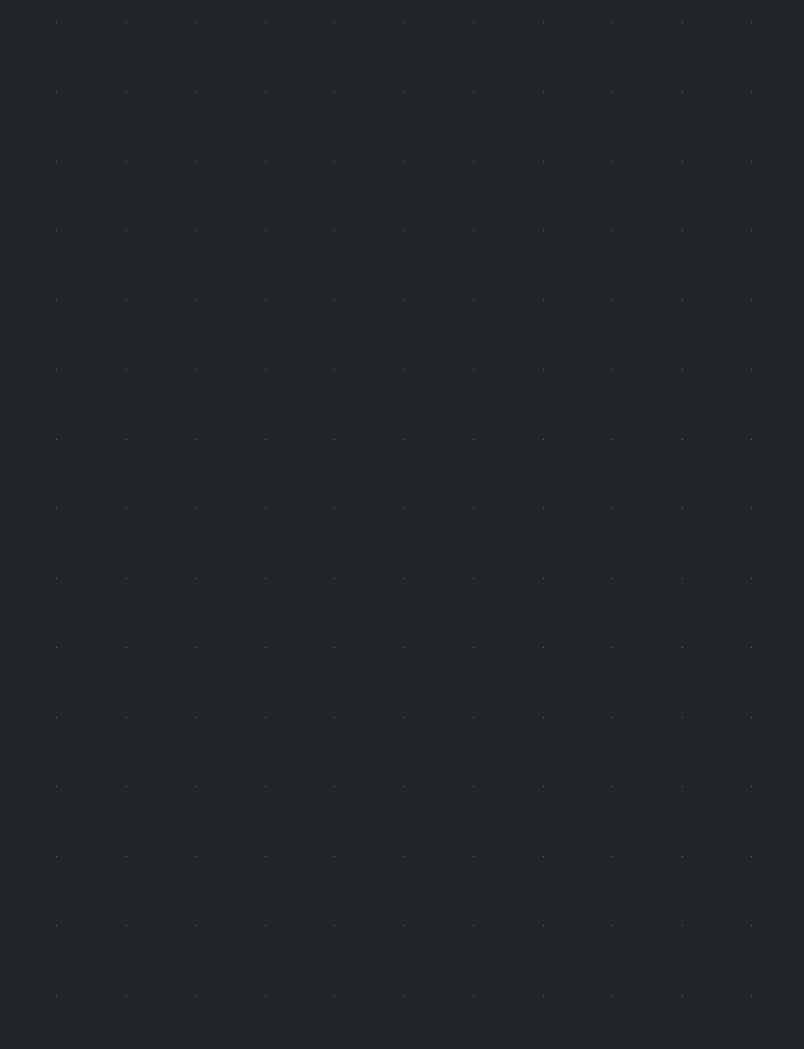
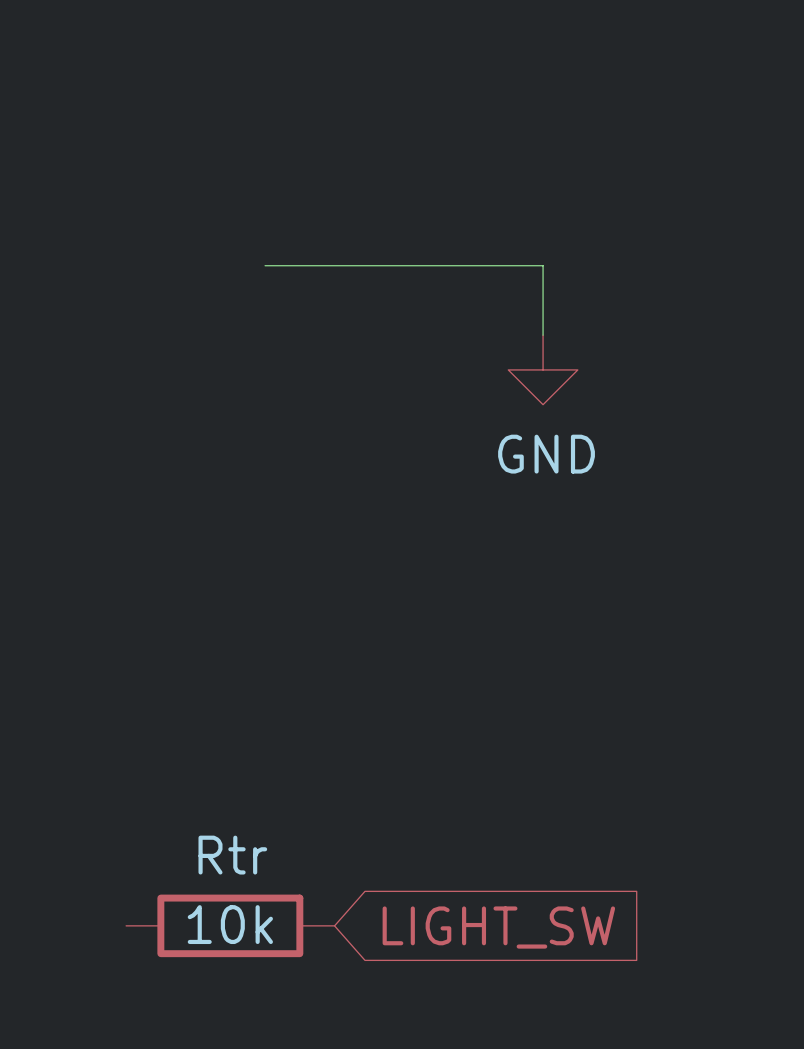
wire: none -> (265, 265) (543, 265) (543, 335)
power symbol: none -> GND (543, 369)
Rtr: none -> 10k (230, 925)
global label: none -> LIGHT_SW (498, 927)

